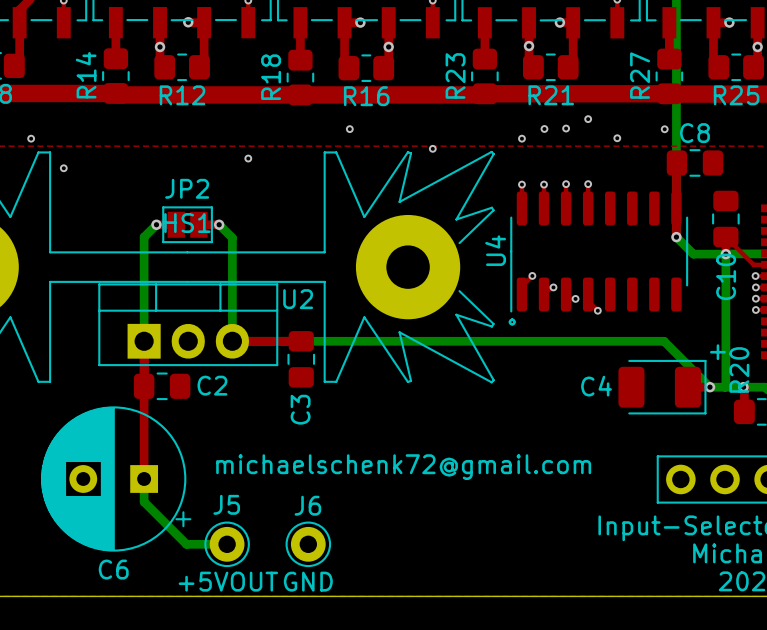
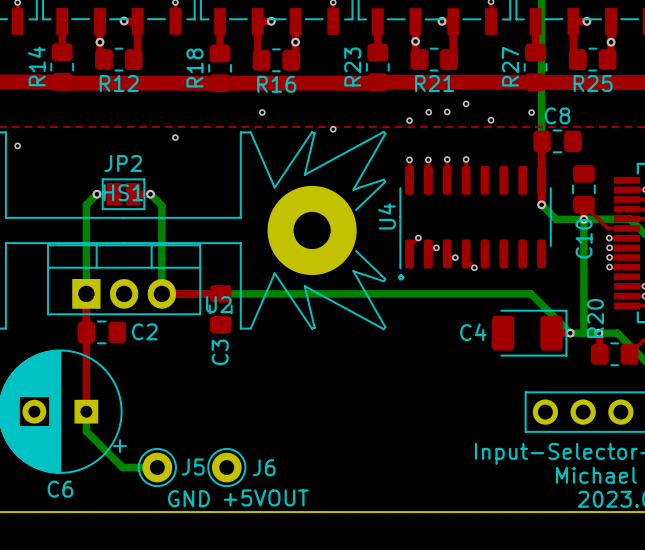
U2 name position: U2 (298, 299) -> U2 (218, 304)
text: + (717, 352) -> none
text: michaelschenk72@gmail.com (403, 467) -> none
J5 name position: J5 (226, 504) -> J5 (193, 466)
J6 name position: J6 (307, 505) -> J6 (264, 467)
text position: +5VOUT (228, 581) -> +5VOUT (266, 497)
text position: GND (308, 581) -> GND (188, 498)

